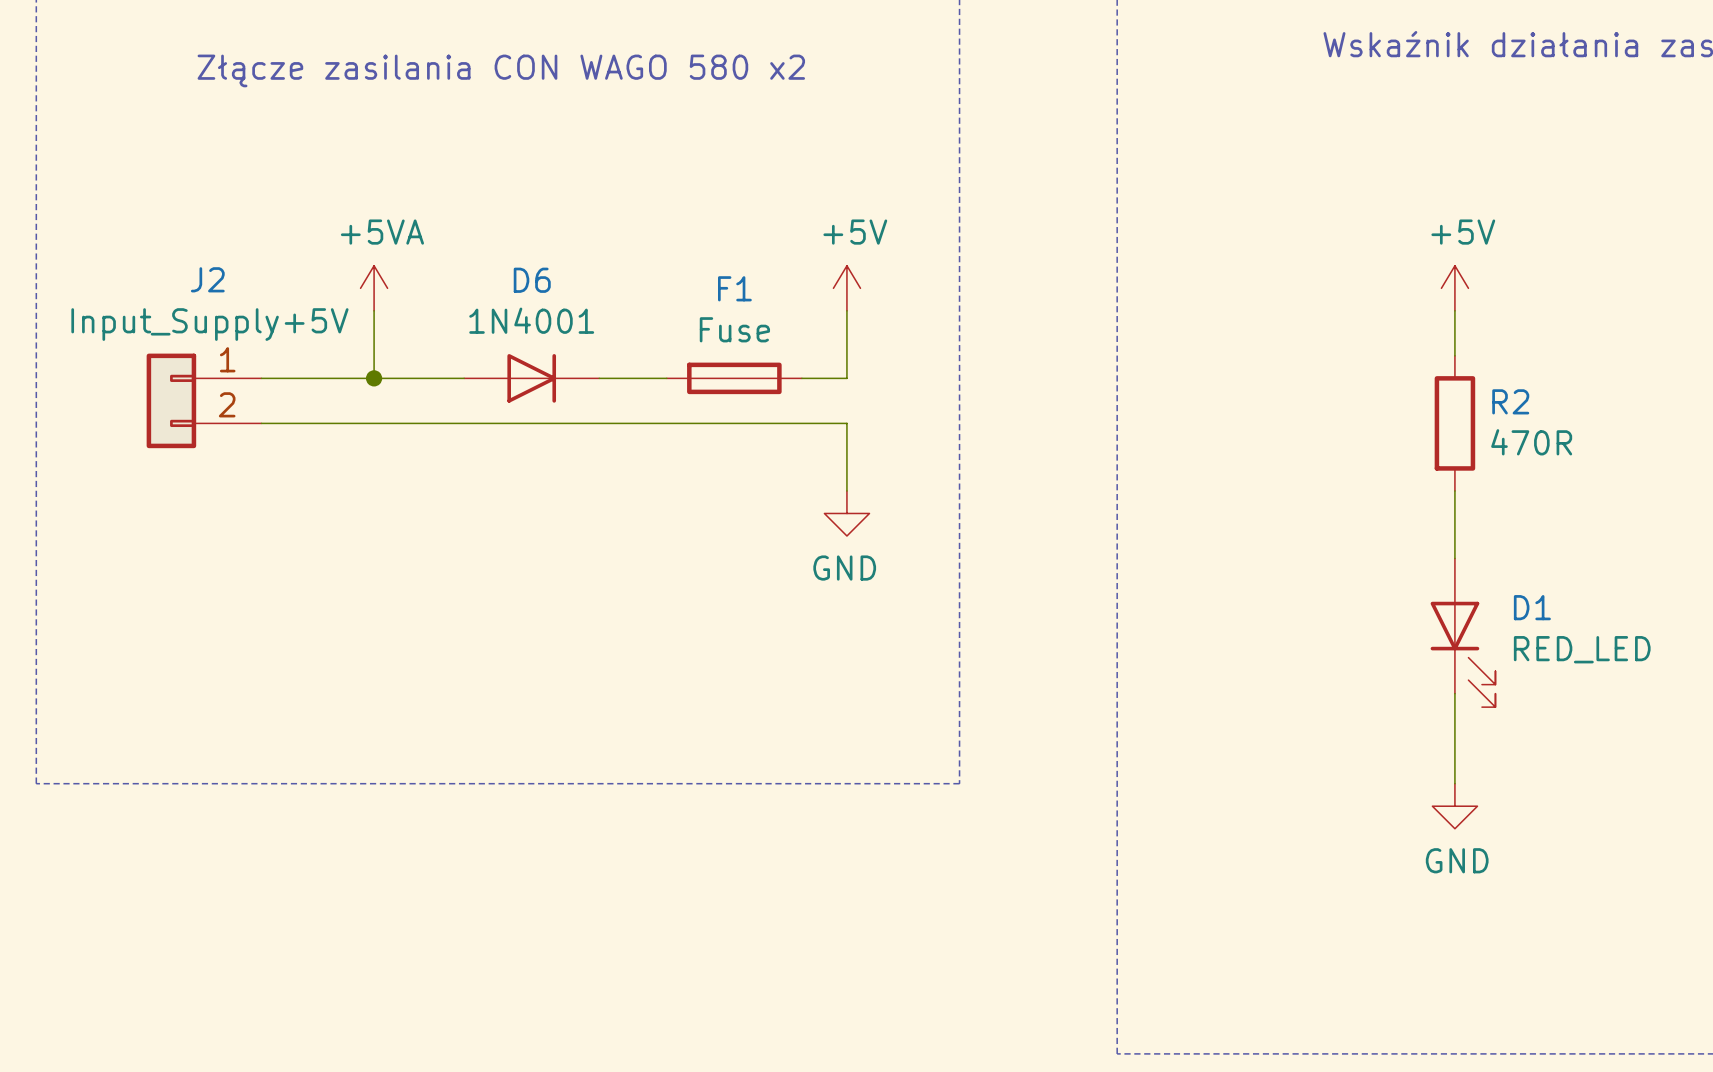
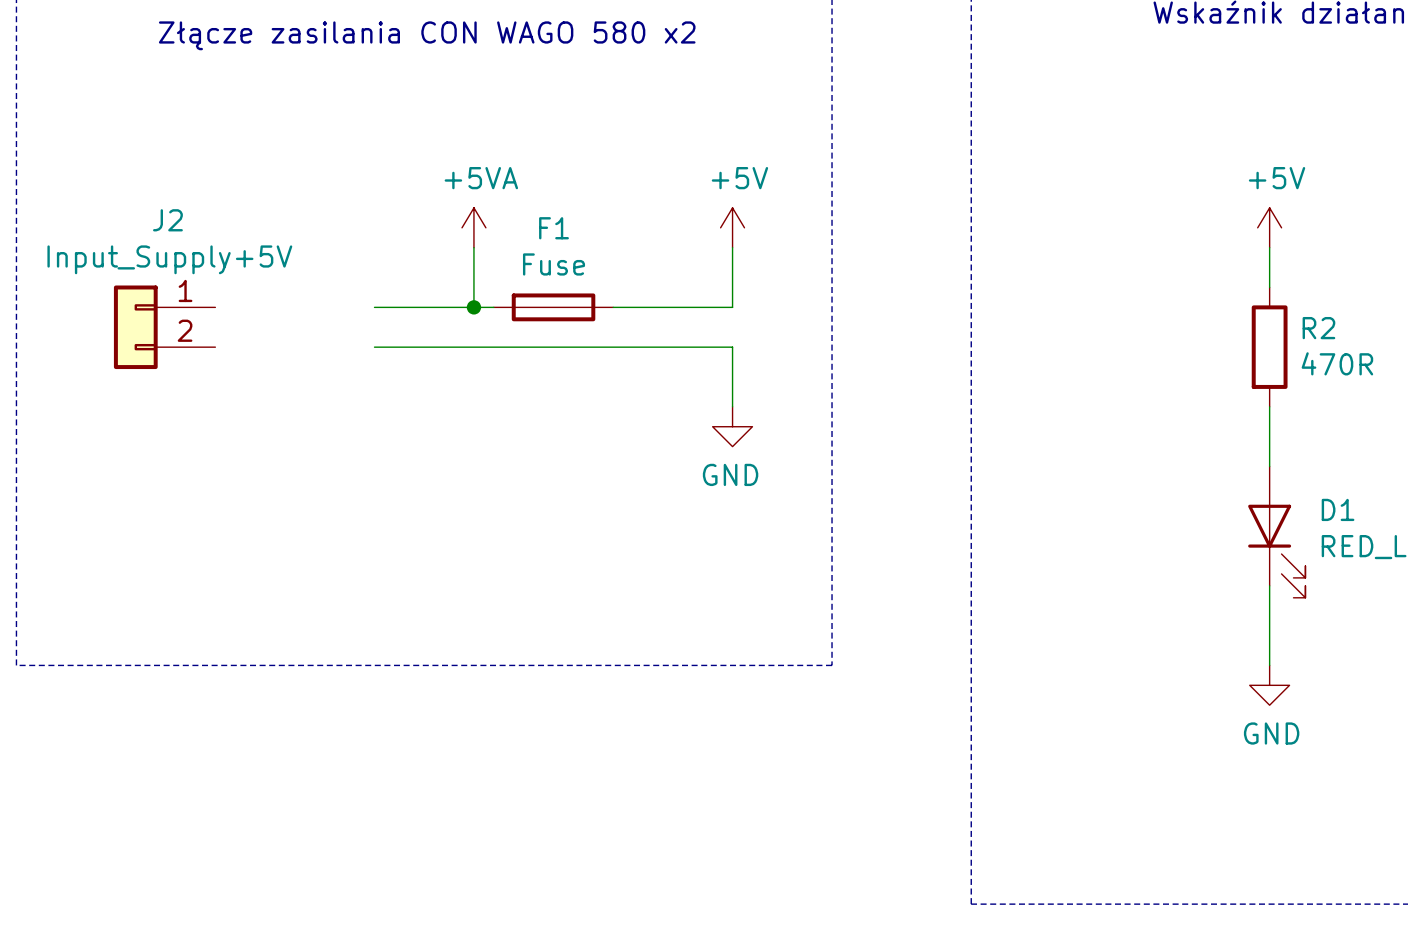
power symbol position: +5VA (374, 288) -> +5VA (473, 227)
wire: (374, 310) (374, 378) -> (473, 247) (473, 307)
wire: (261, 378) (441, 378) -> none
junction: (374, 378) -> none
D6: 1N4001 (531, 378) -> none
junction: none -> (473, 307)
F1 position: (734, 378) -> (553, 307)
wire: (261, 423) (441, 423) -> none

